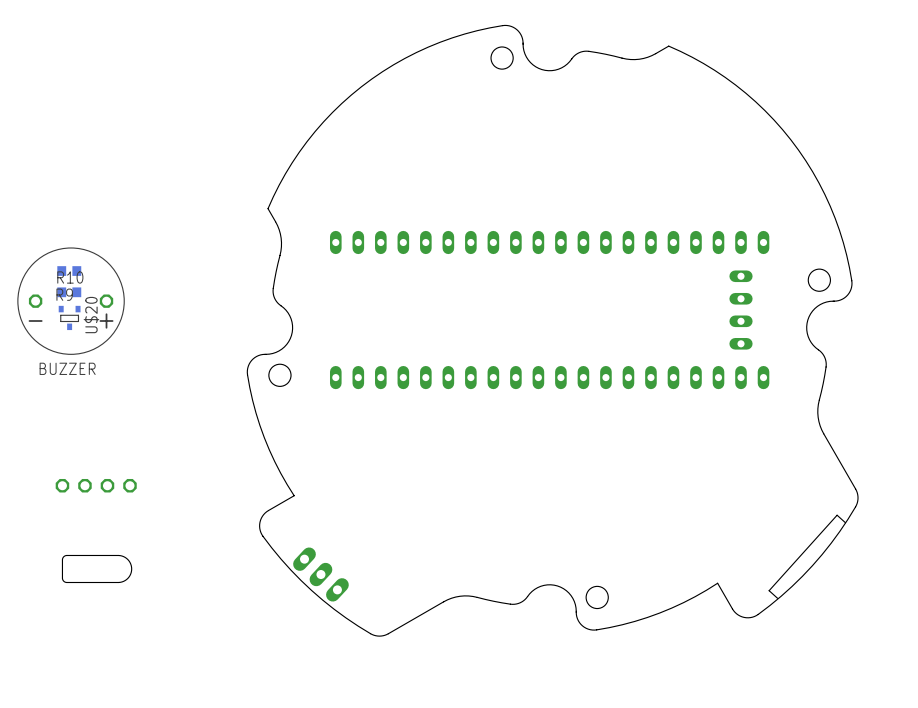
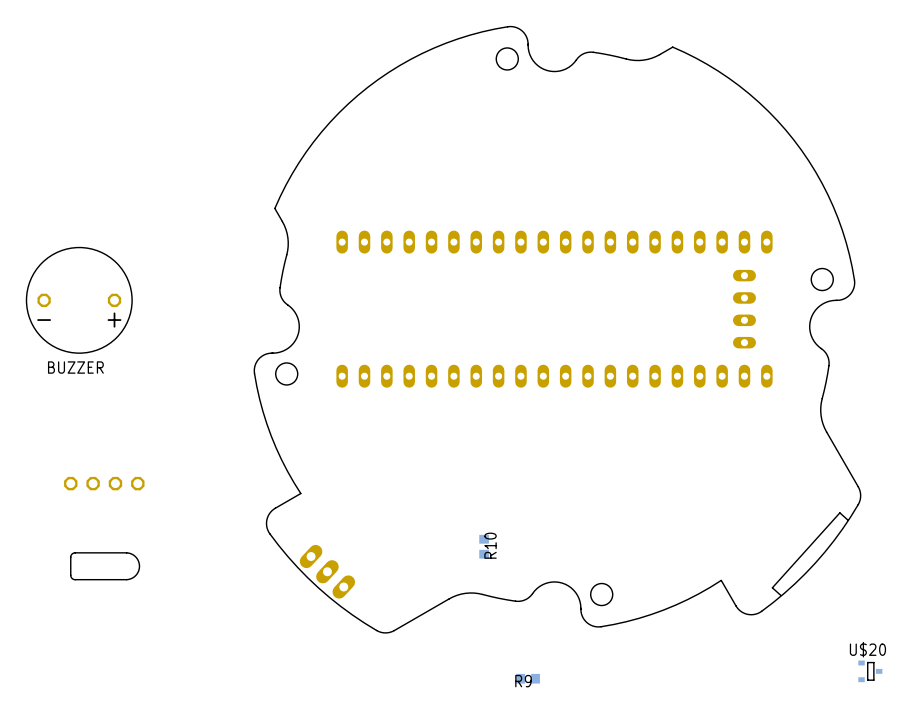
R10 rotation: 0° (69, 271) -> 90° clockwise (484, 546)
R10 position: (69, 271) -> (484, 546)
R9 position: (69, 292) -> (528, 678)
U$20 rotation: 0° (69, 317) -> 90° counterclockwise (870, 671)
U$20 position: (69, 317) -> (870, 671)

